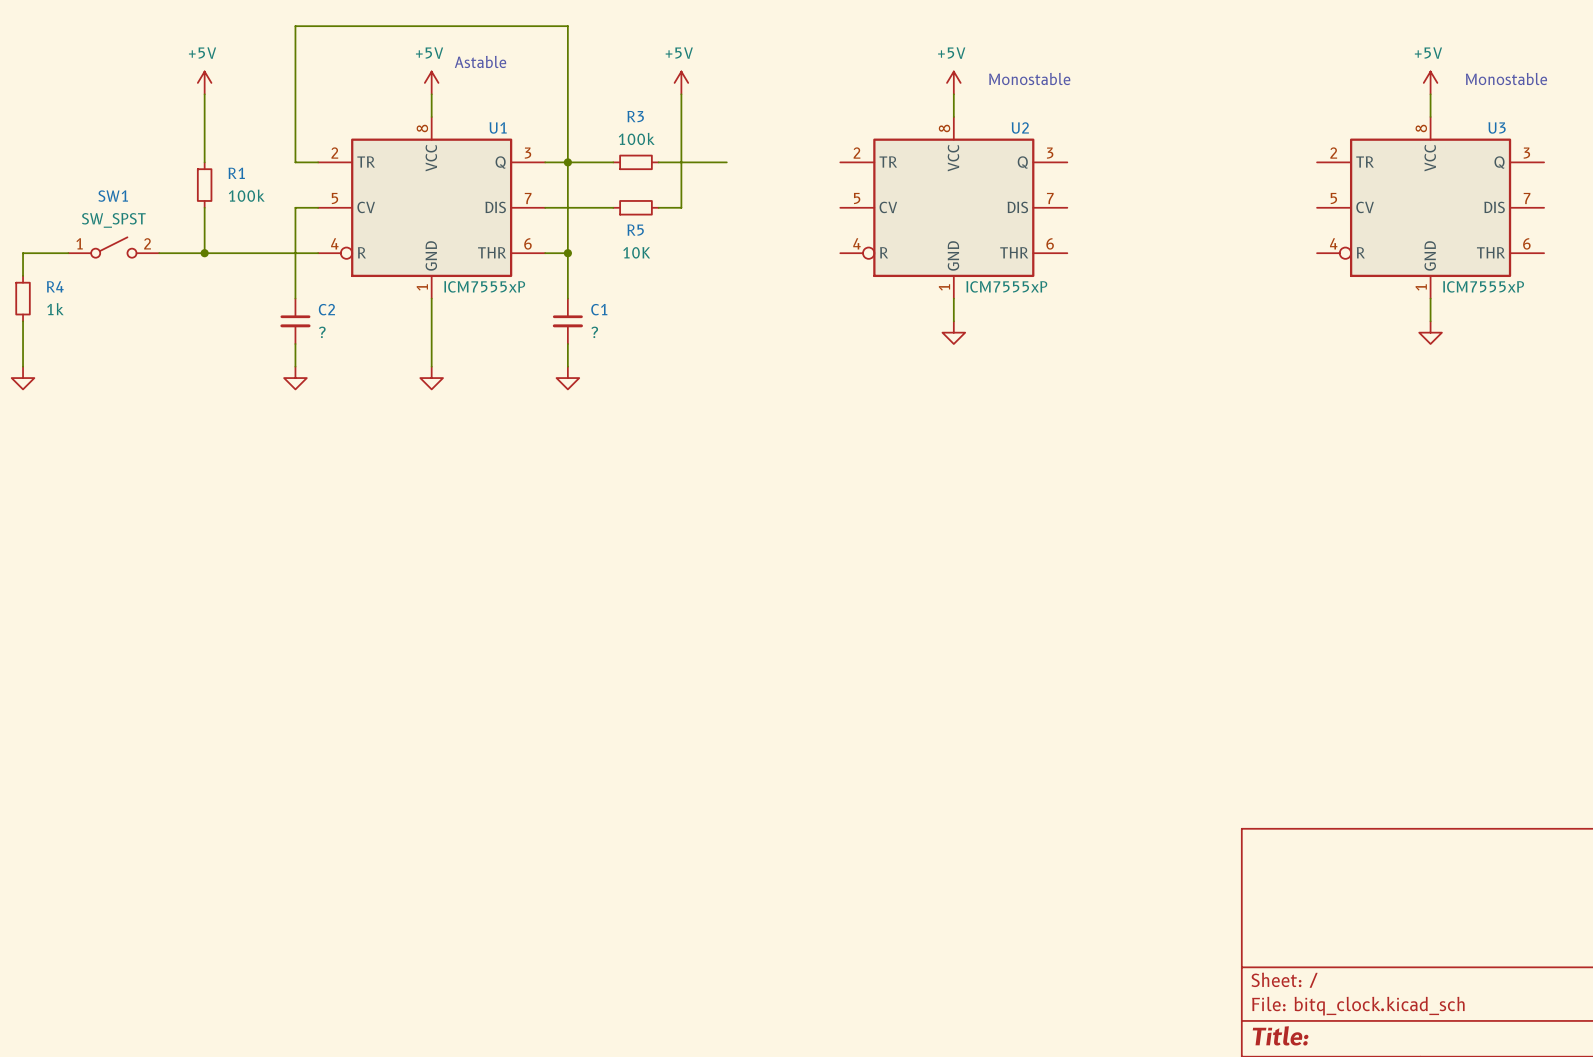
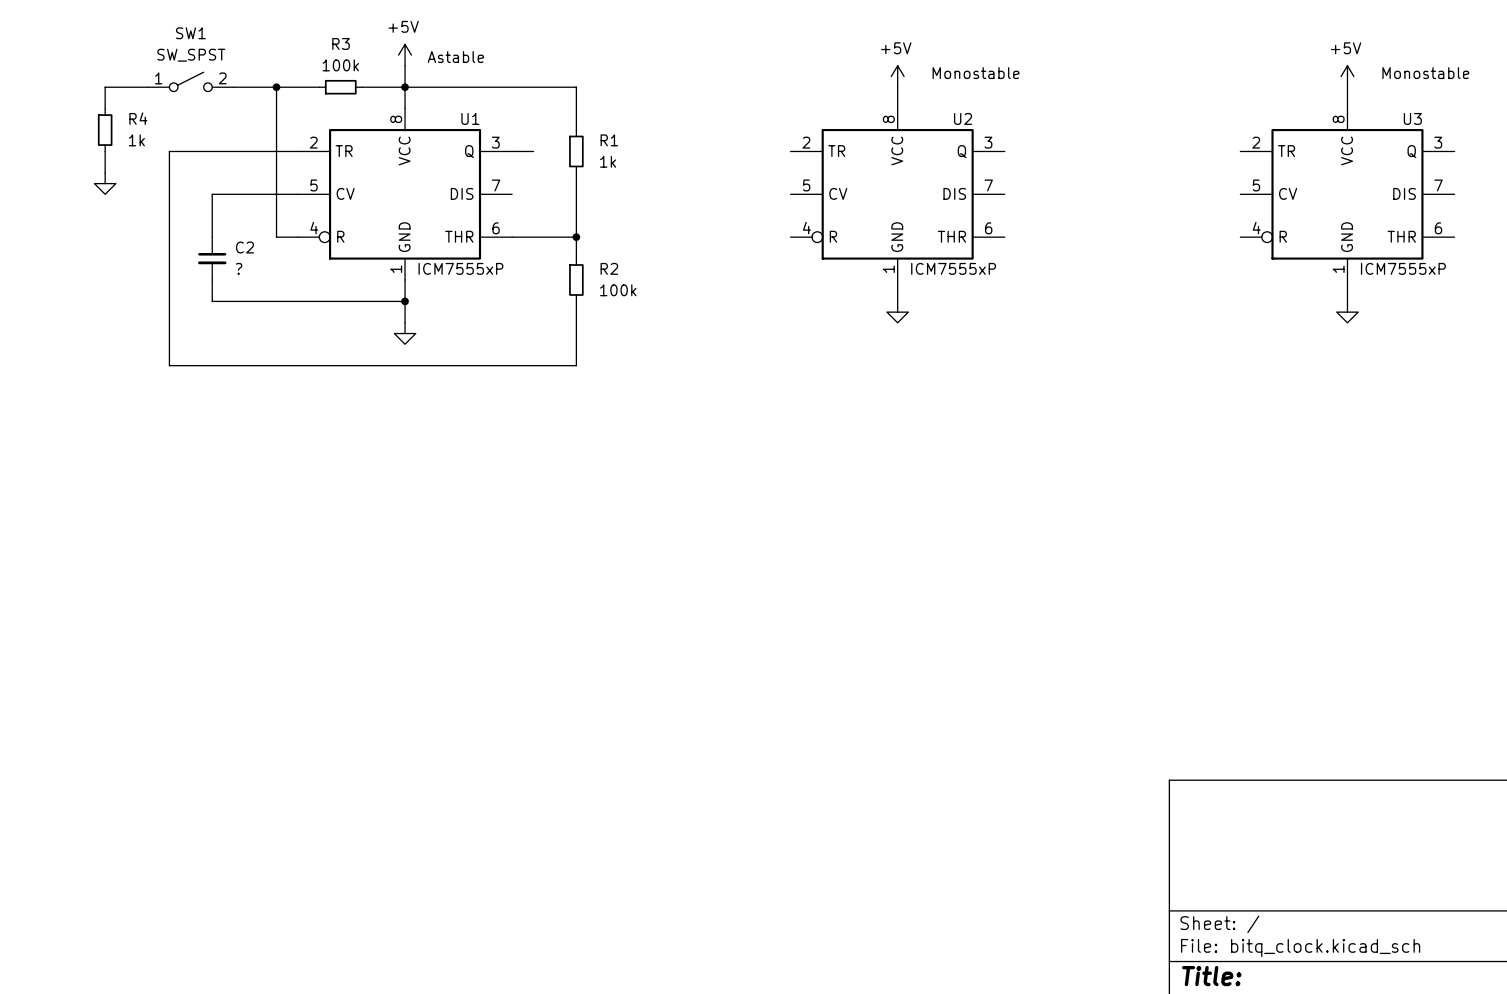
power symbol: +5V (204, 82) -> none
power symbol position: +5V (431, 82) -> +5V (405, 55)
power symbol: +5V (681, 82) -> none
wire: (204, 94) (204, 162) -> none
wire: none -> (233, 87) (319, 87)
wire: (295, 94) (295, 26) (567, 26) (567, 298) -> none
junction: none -> (276, 87)
wire: none -> (362, 87) (576, 87) (576, 130)
junction: none -> (405, 87)
wire: (681, 94) (681, 207) (658, 207) -> none
wire: none -> (105, 151) (105, 172)
wire: (567, 162) (613, 162) -> (533, 237) (576, 237)
junction: (567, 162) -> none
R3 position: (635, 162) -> (340, 87)
wire: (658, 162) (726, 162) -> none
R1 position: (204, 185) -> (576, 151)
wire: none -> (576, 172) (576, 258)
R1 value: 100k (246, 195) -> 1k (608, 161)
power symbol: none -> (105, 183)
wire: (204, 207) (204, 253) -> none
wire: (545, 207) (613, 207) -> none
R5: 10K (635, 207) -> none
SW1 position: (113, 247) -> (190, 81)
wire: (68, 253) (23, 253) (23, 275) -> (148, 87) (105, 87) (105, 108)
wire: (159, 253) (295, 253) (295, 298) -> none
junction: (204, 253) -> none
wire: none -> (212, 237) (212, 194) (276, 194) (276, 151) (169, 151) (169, 365) (576, 365) (576, 301)
junction position: (567, 253) -> (576, 237)
R4 position: (23, 298) -> (105, 130)
wire: none -> (212, 279) (212, 301) (405, 301)
R2: none -> 100k (576, 279)
wire: (23, 321) (23, 366) -> none
C2 position: (295, 321) -> (212, 258)
junction: none -> (405, 301)
C1: ? (567, 321) -> none
wire: (295, 344) (295, 366) -> none
wire: (567, 344) (567, 366) -> none
power symbol: (23, 378) -> none
power symbol: (295, 378) -> none
power symbol position: (431, 378) -> (405, 333)
power symbol: (567, 378) -> none

